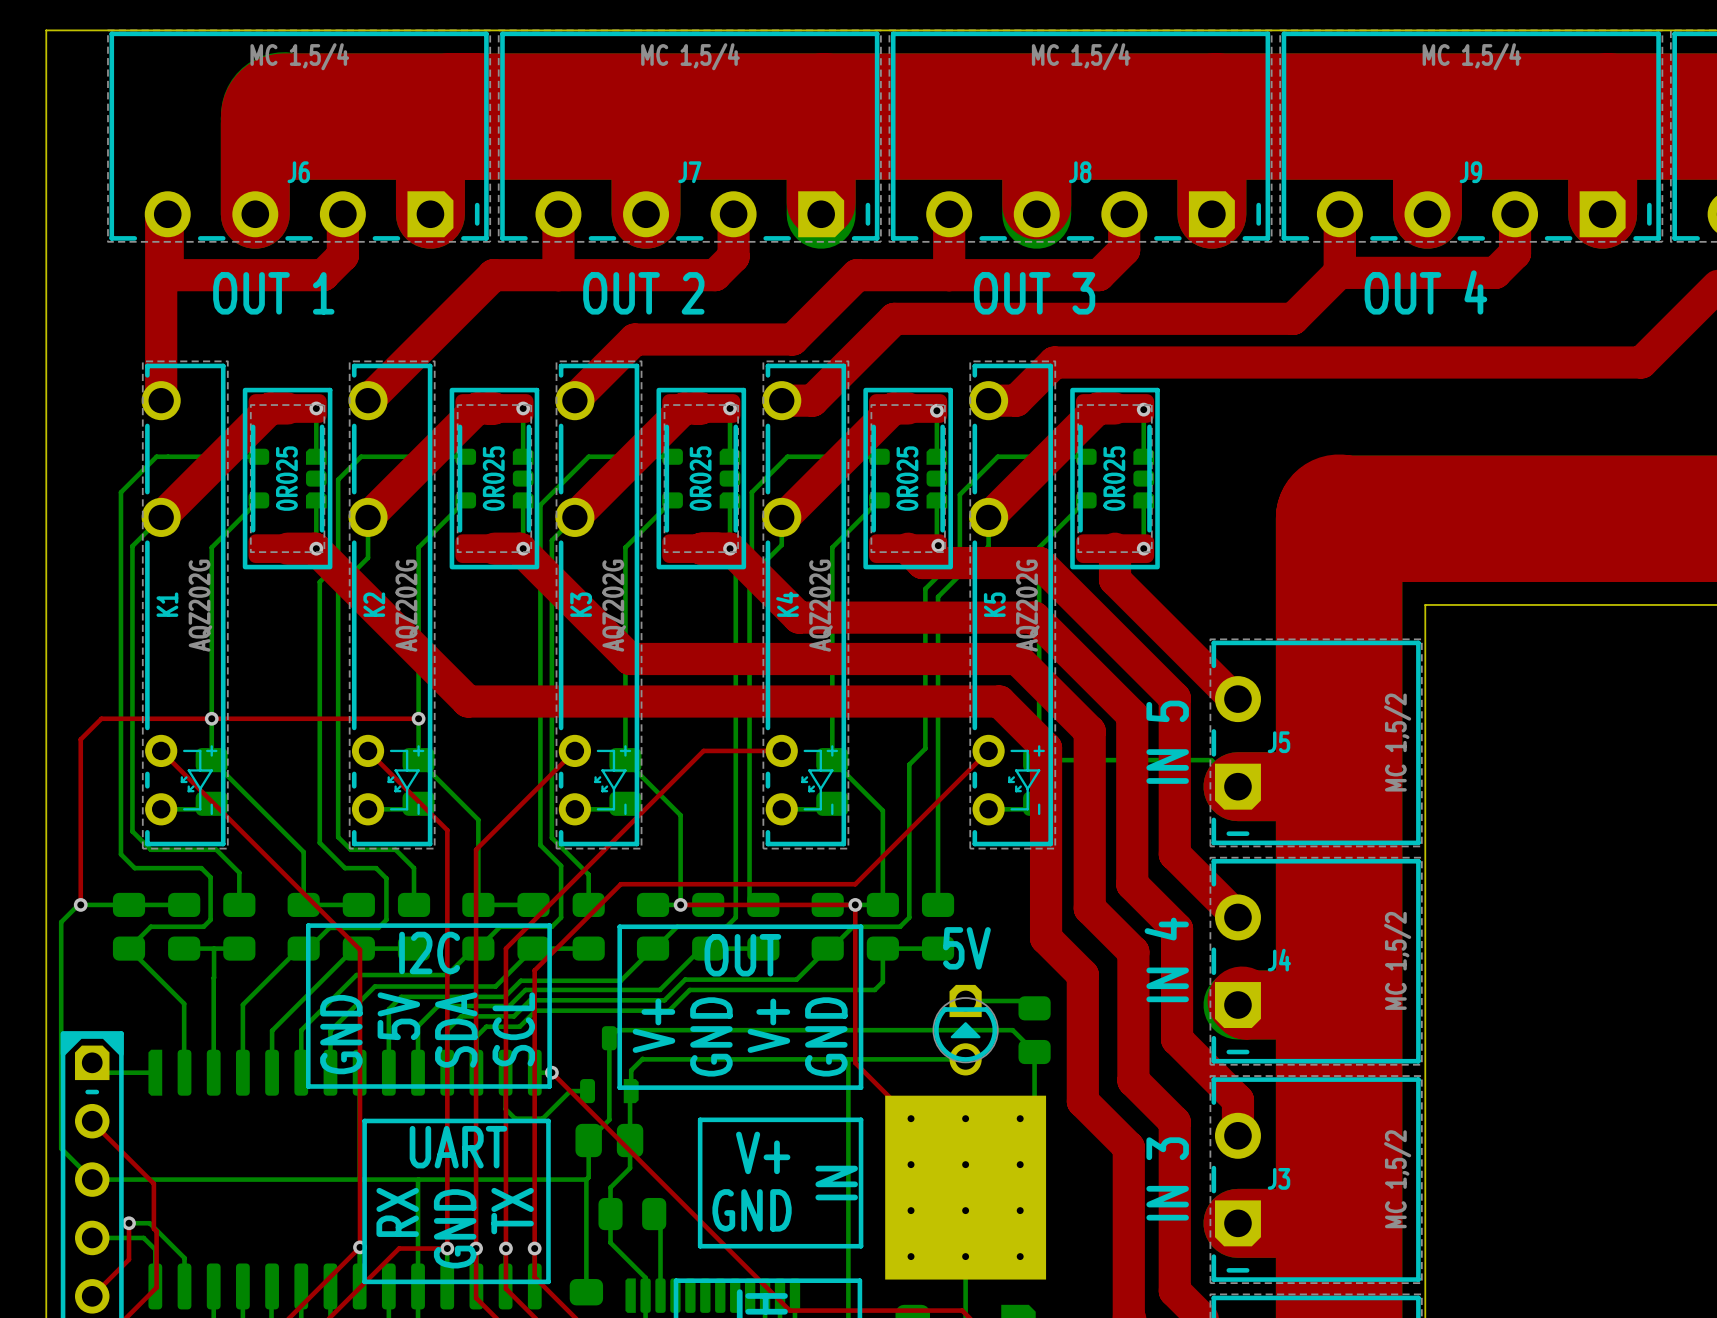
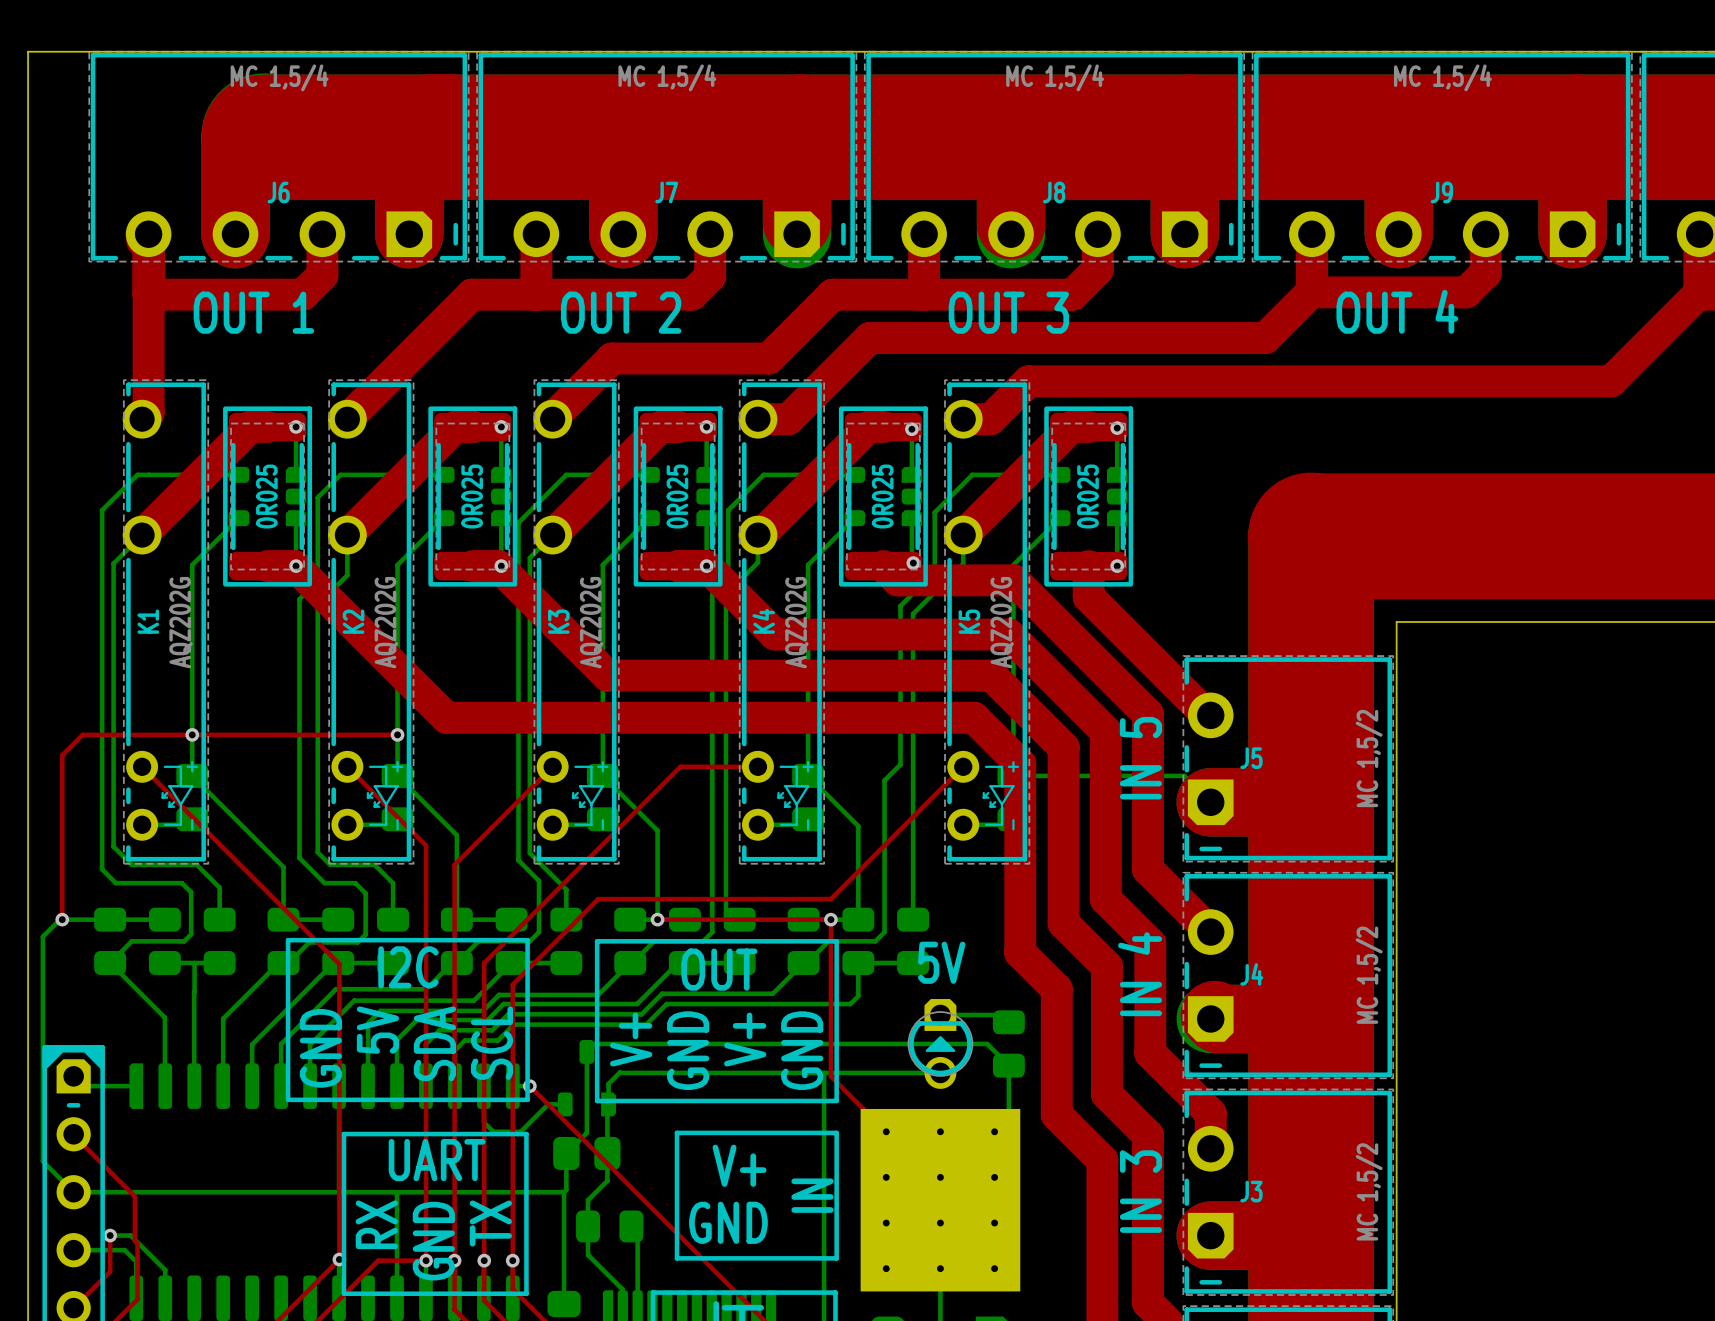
top track: (161, 220) (161, 400) -> (148, 294) (148, 412) (142, 419)

